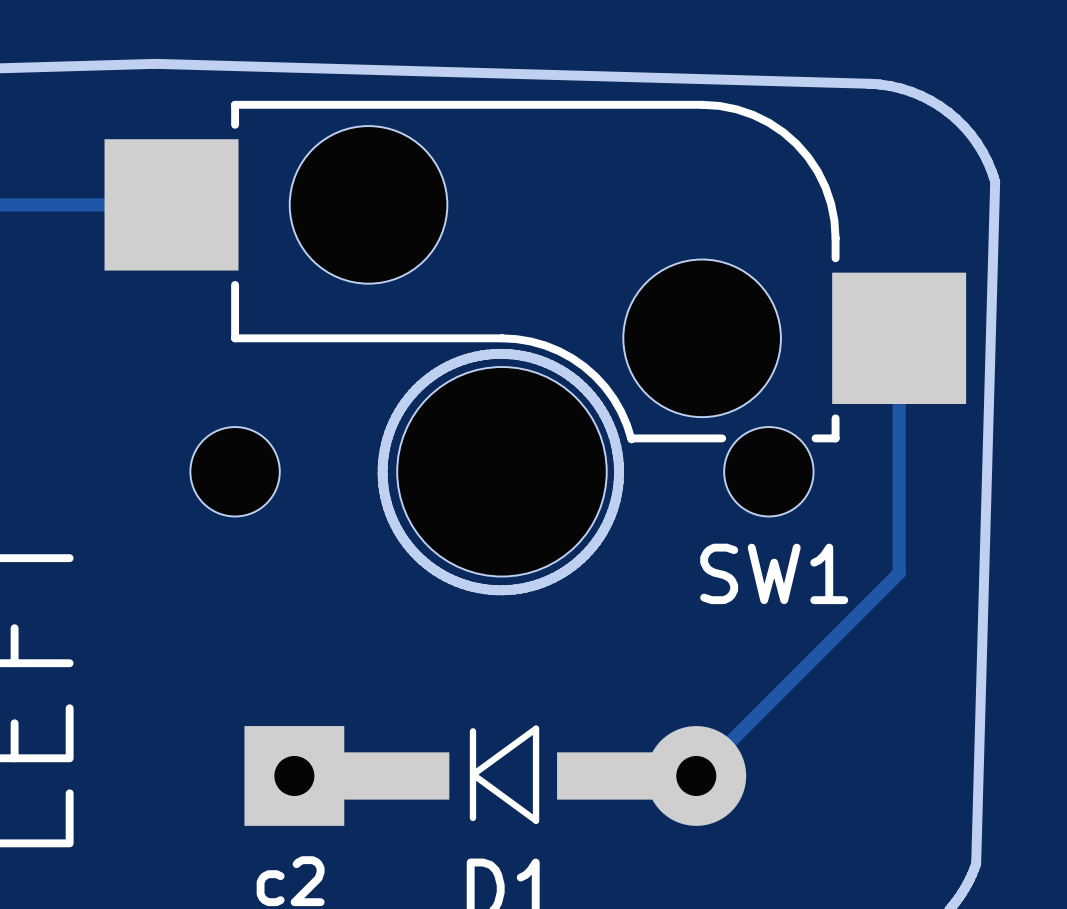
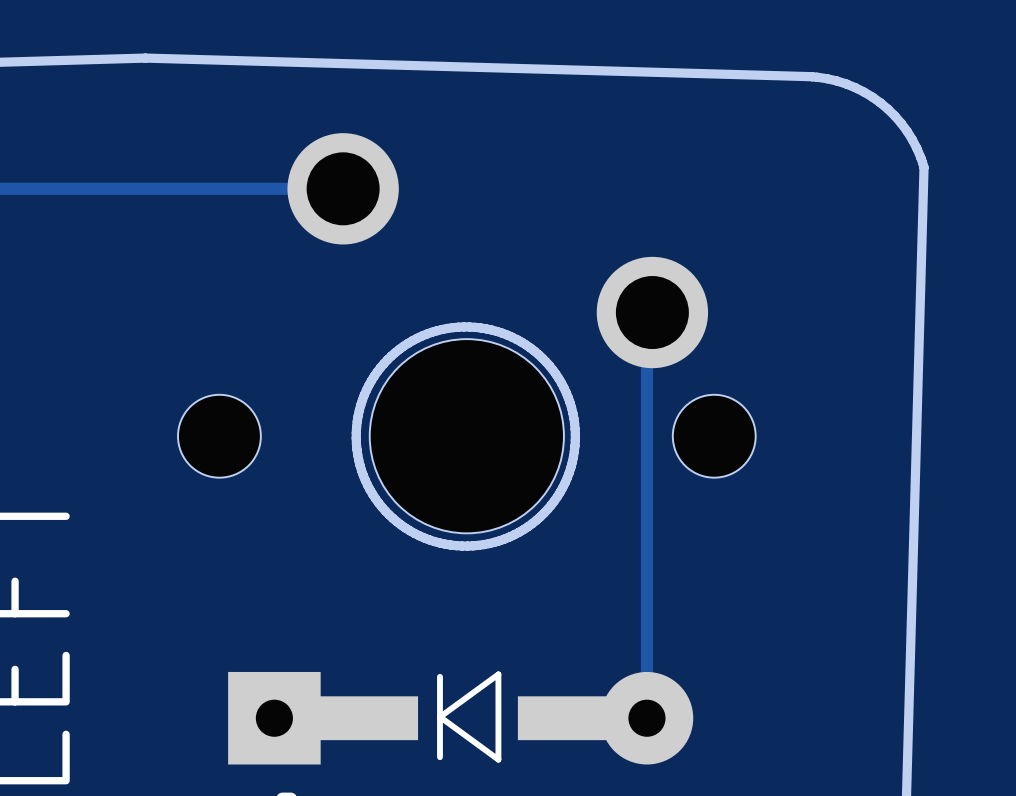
track: none -> (160, 188) (343, 188)
SW1: (535, 338) -> none
track: (899, 338) (899, 573) (696, 775) -> (652, 312) (646, 317) (646, 718)
part: none -> (466, 333)

